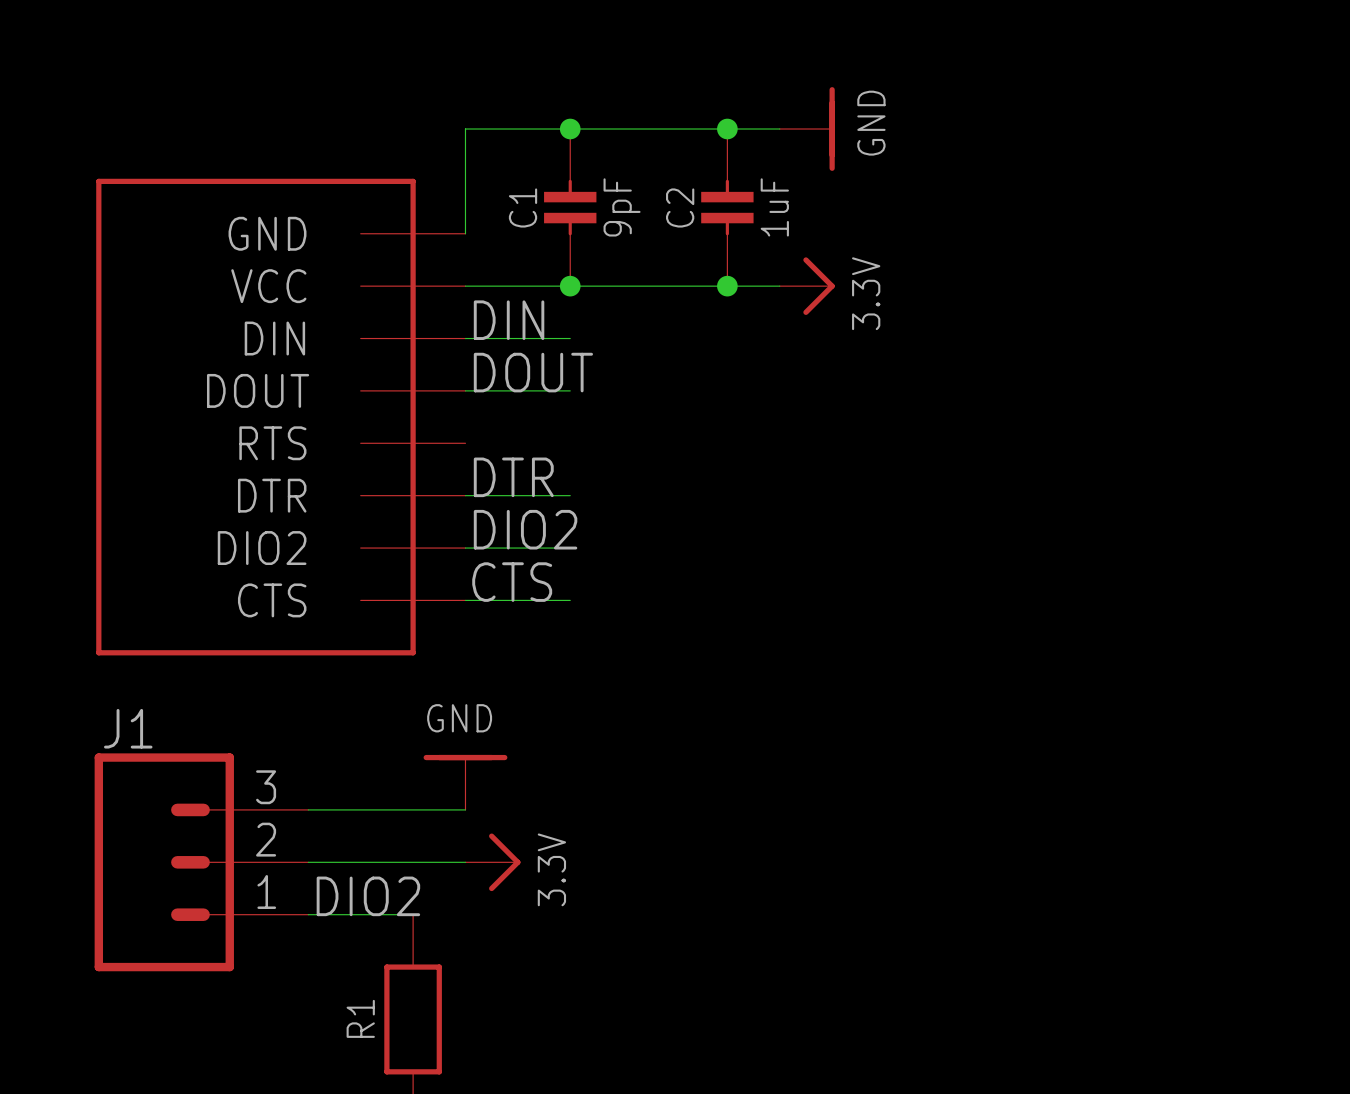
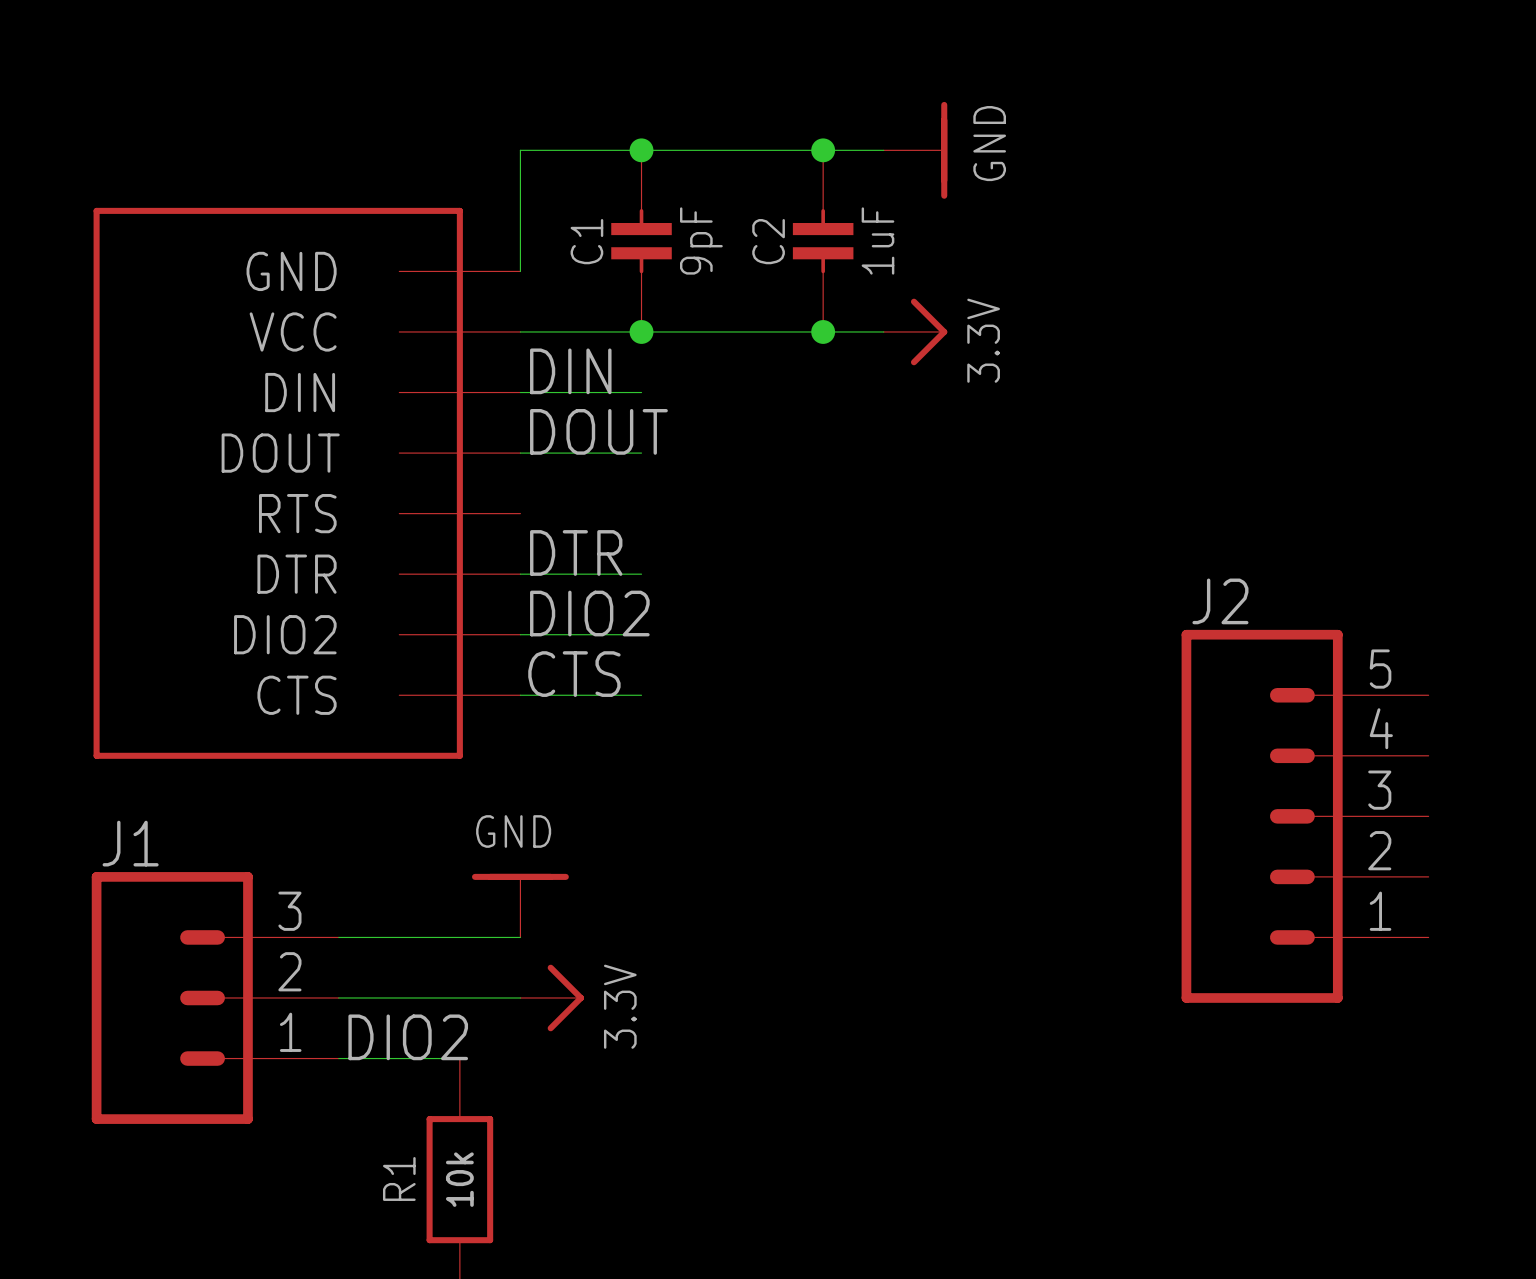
J2: none -> (1305, 816)
R1 value: none -> 10k (459, 1179)

